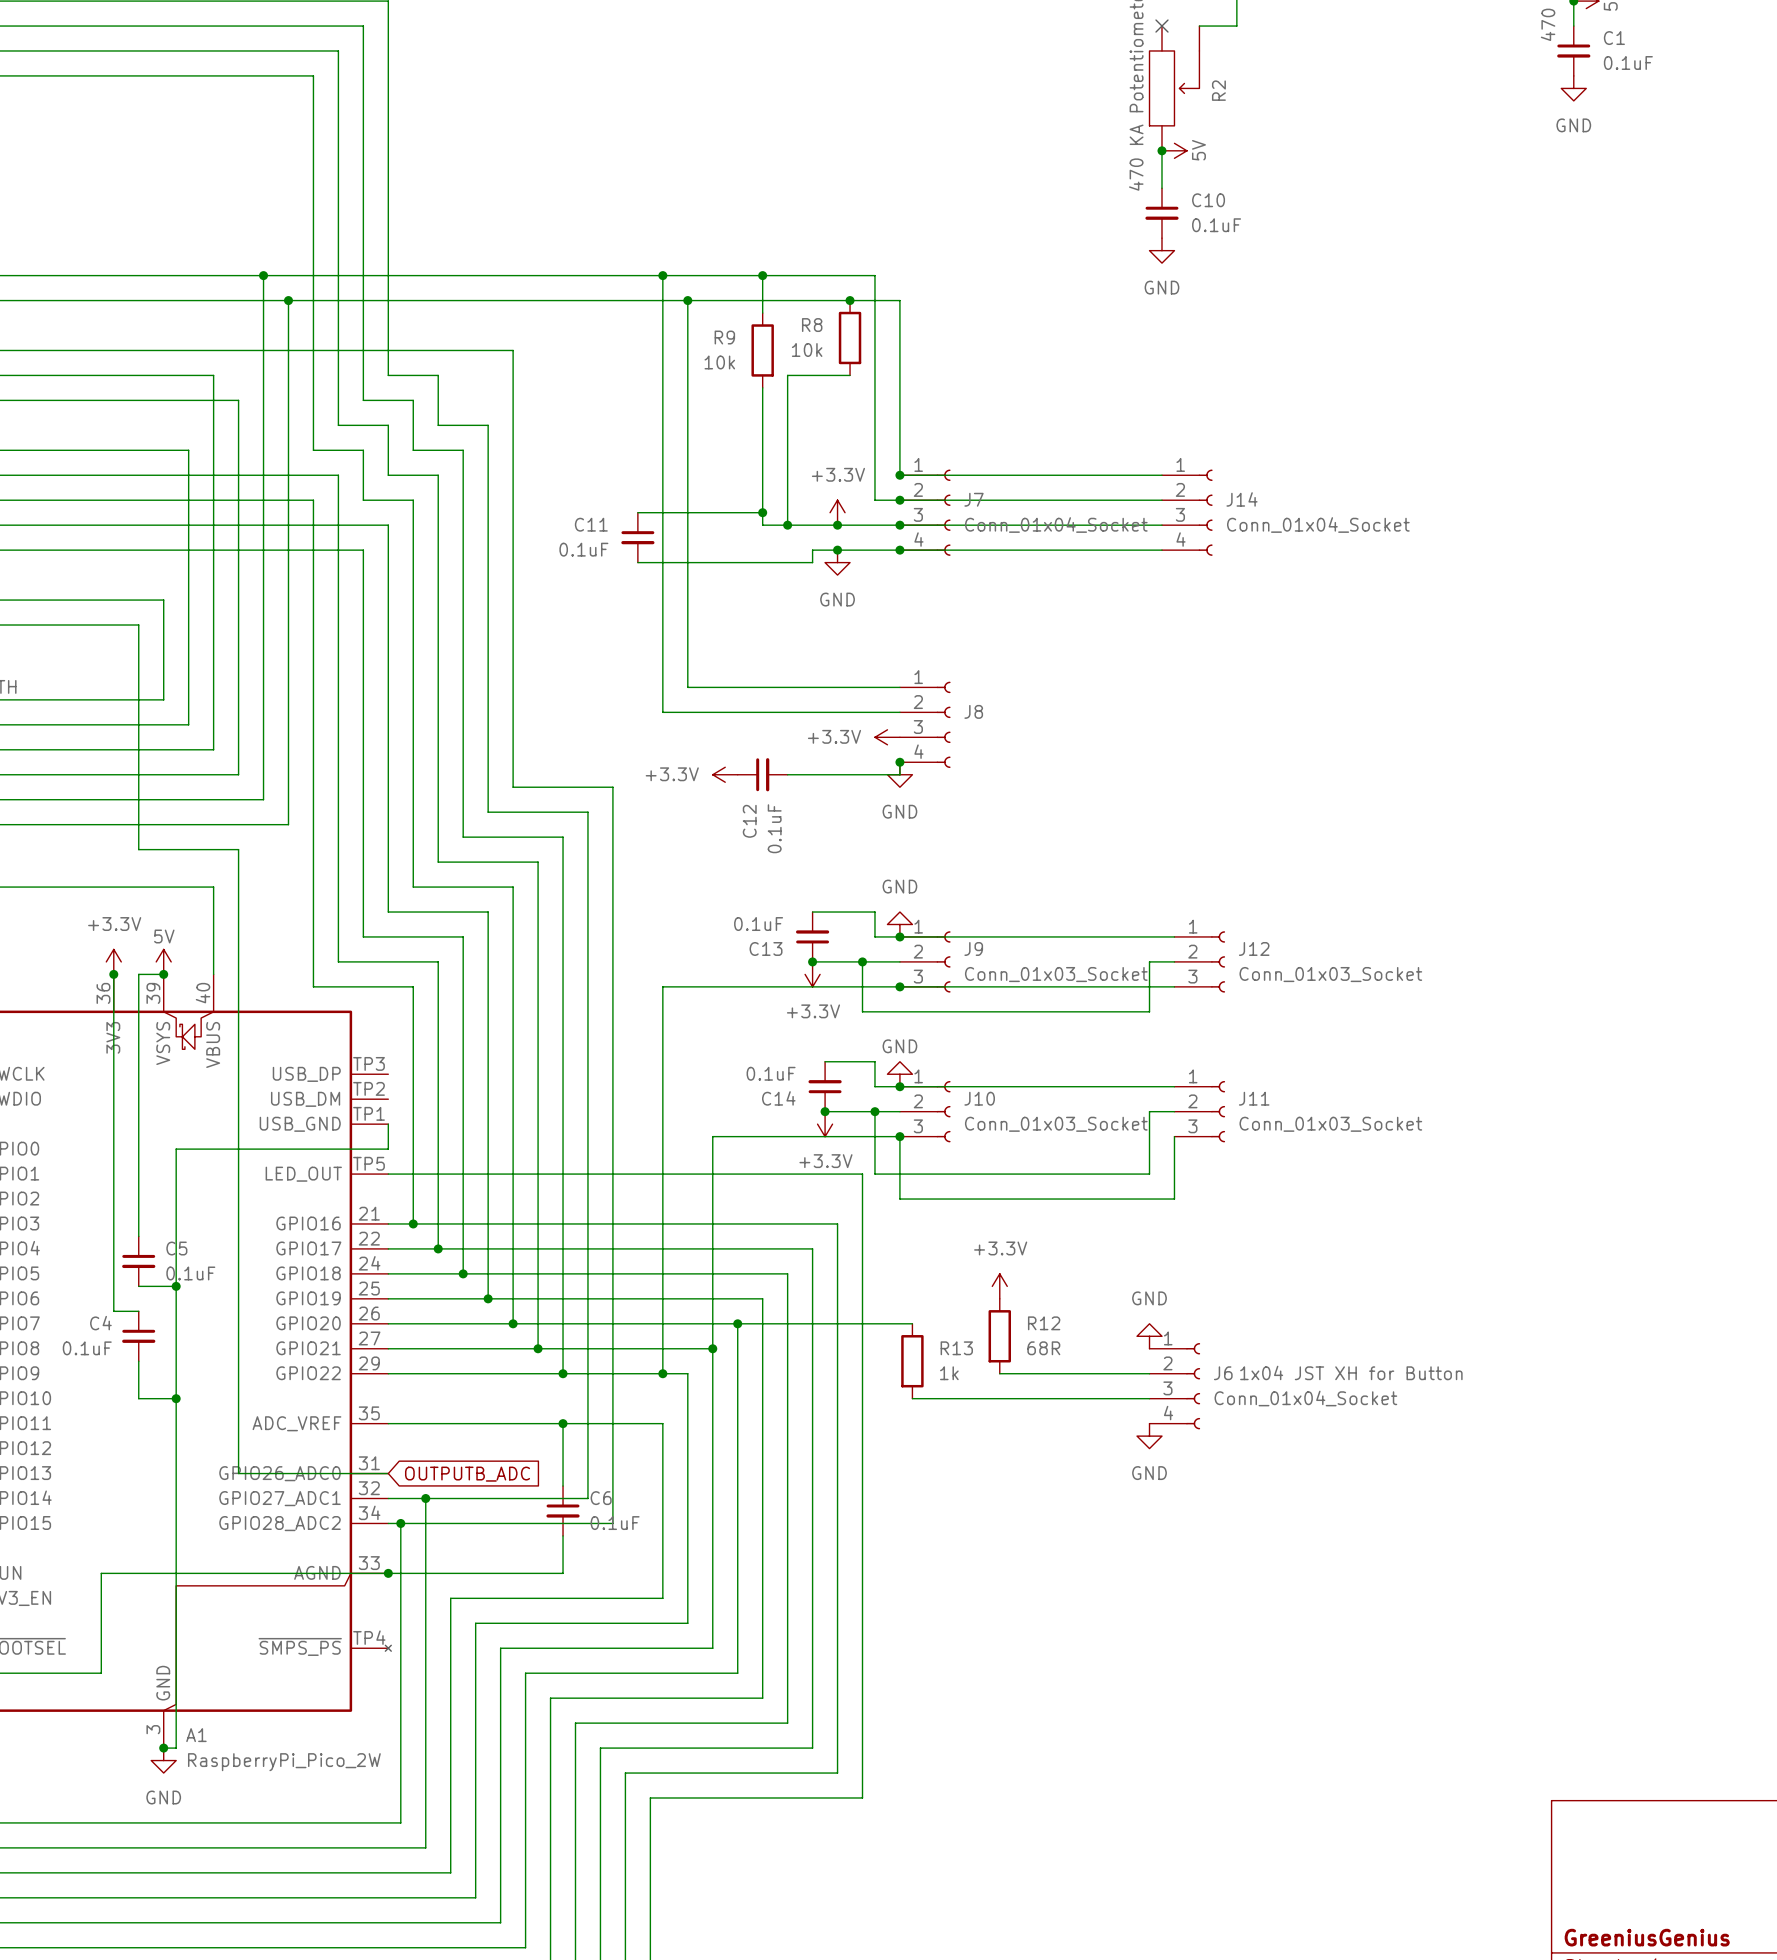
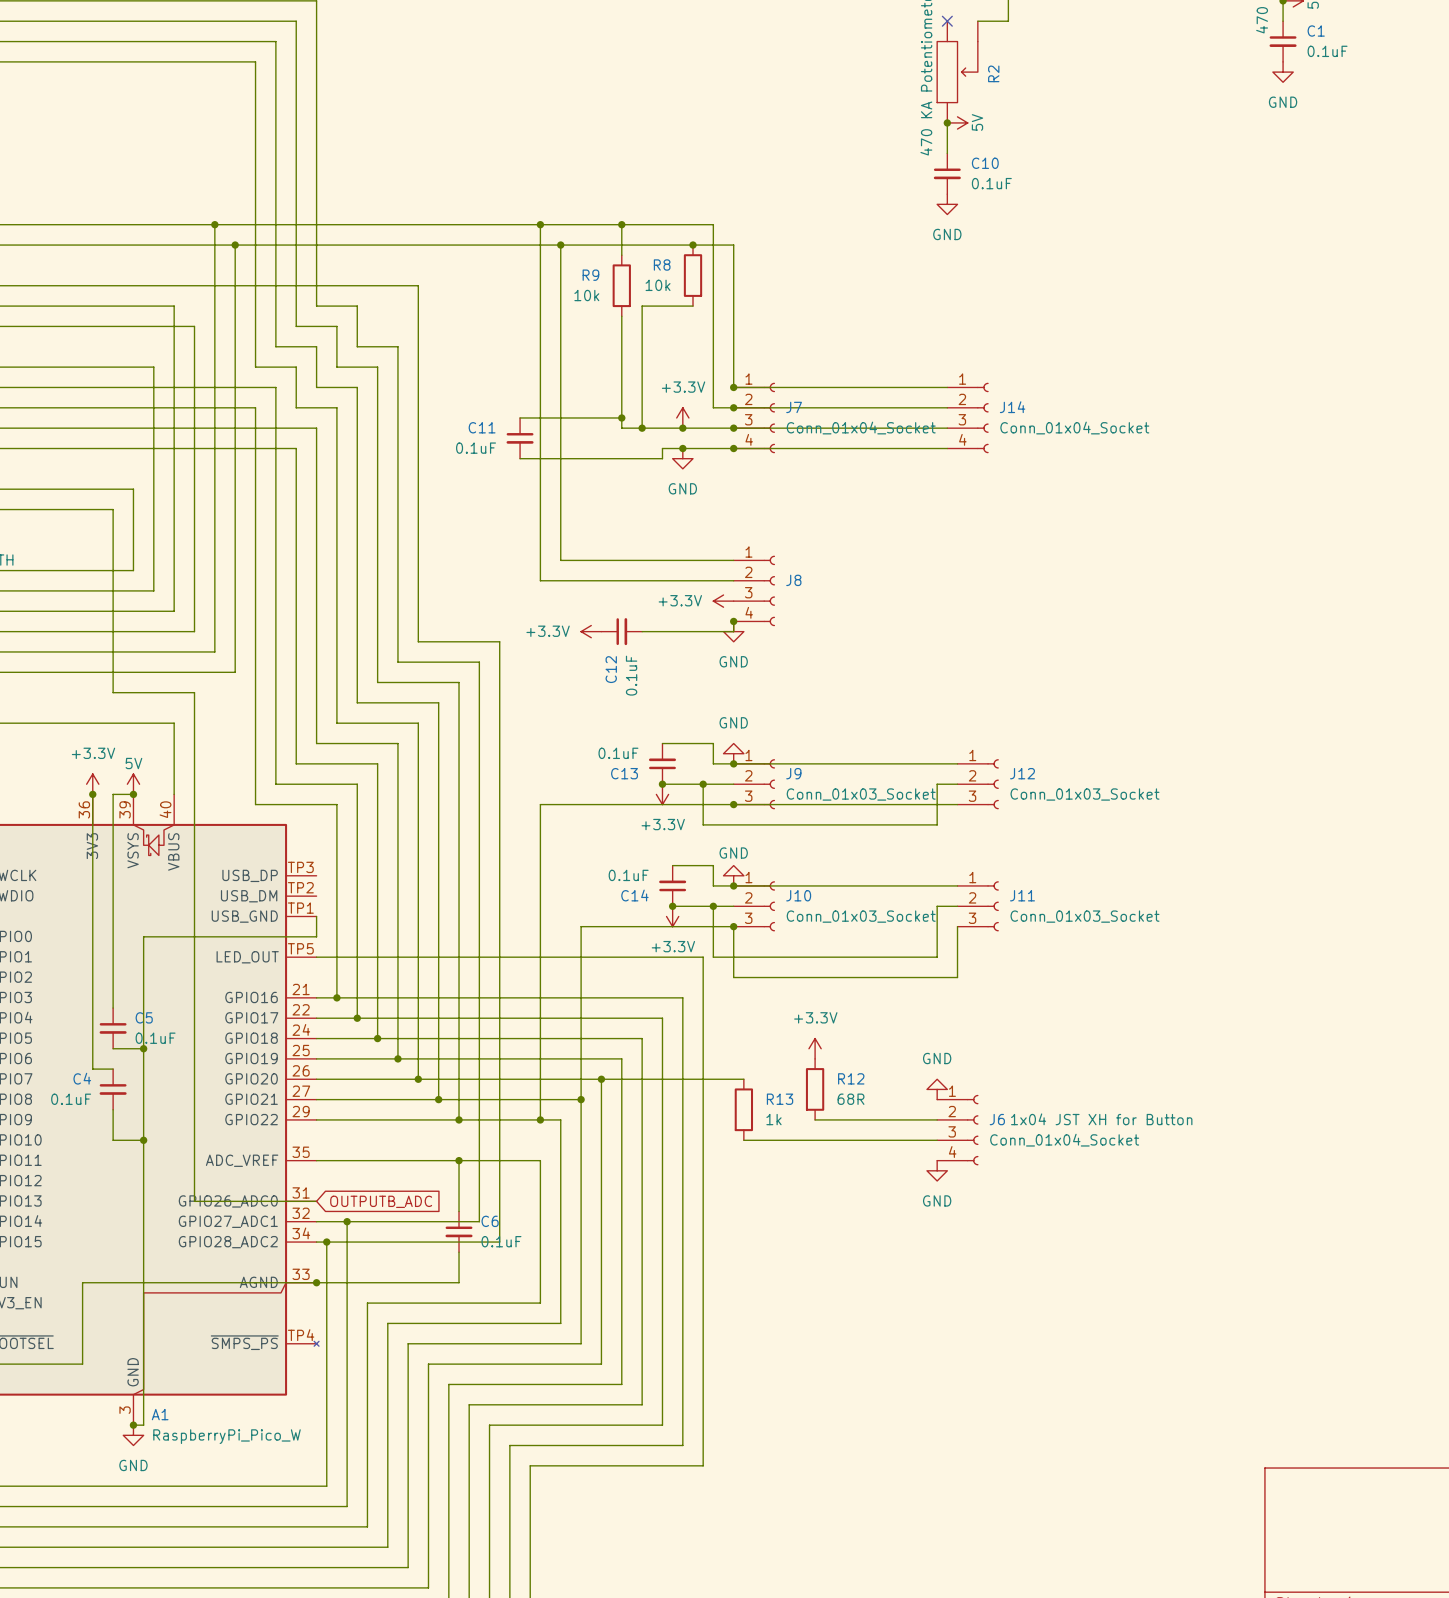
A1 value: RaspberryPi_Pico_2W (284, 1762) -> RaspberryPi_Pico_W (227, 1436)
title block: GreeniusGenius (1647, 1937) -> none

